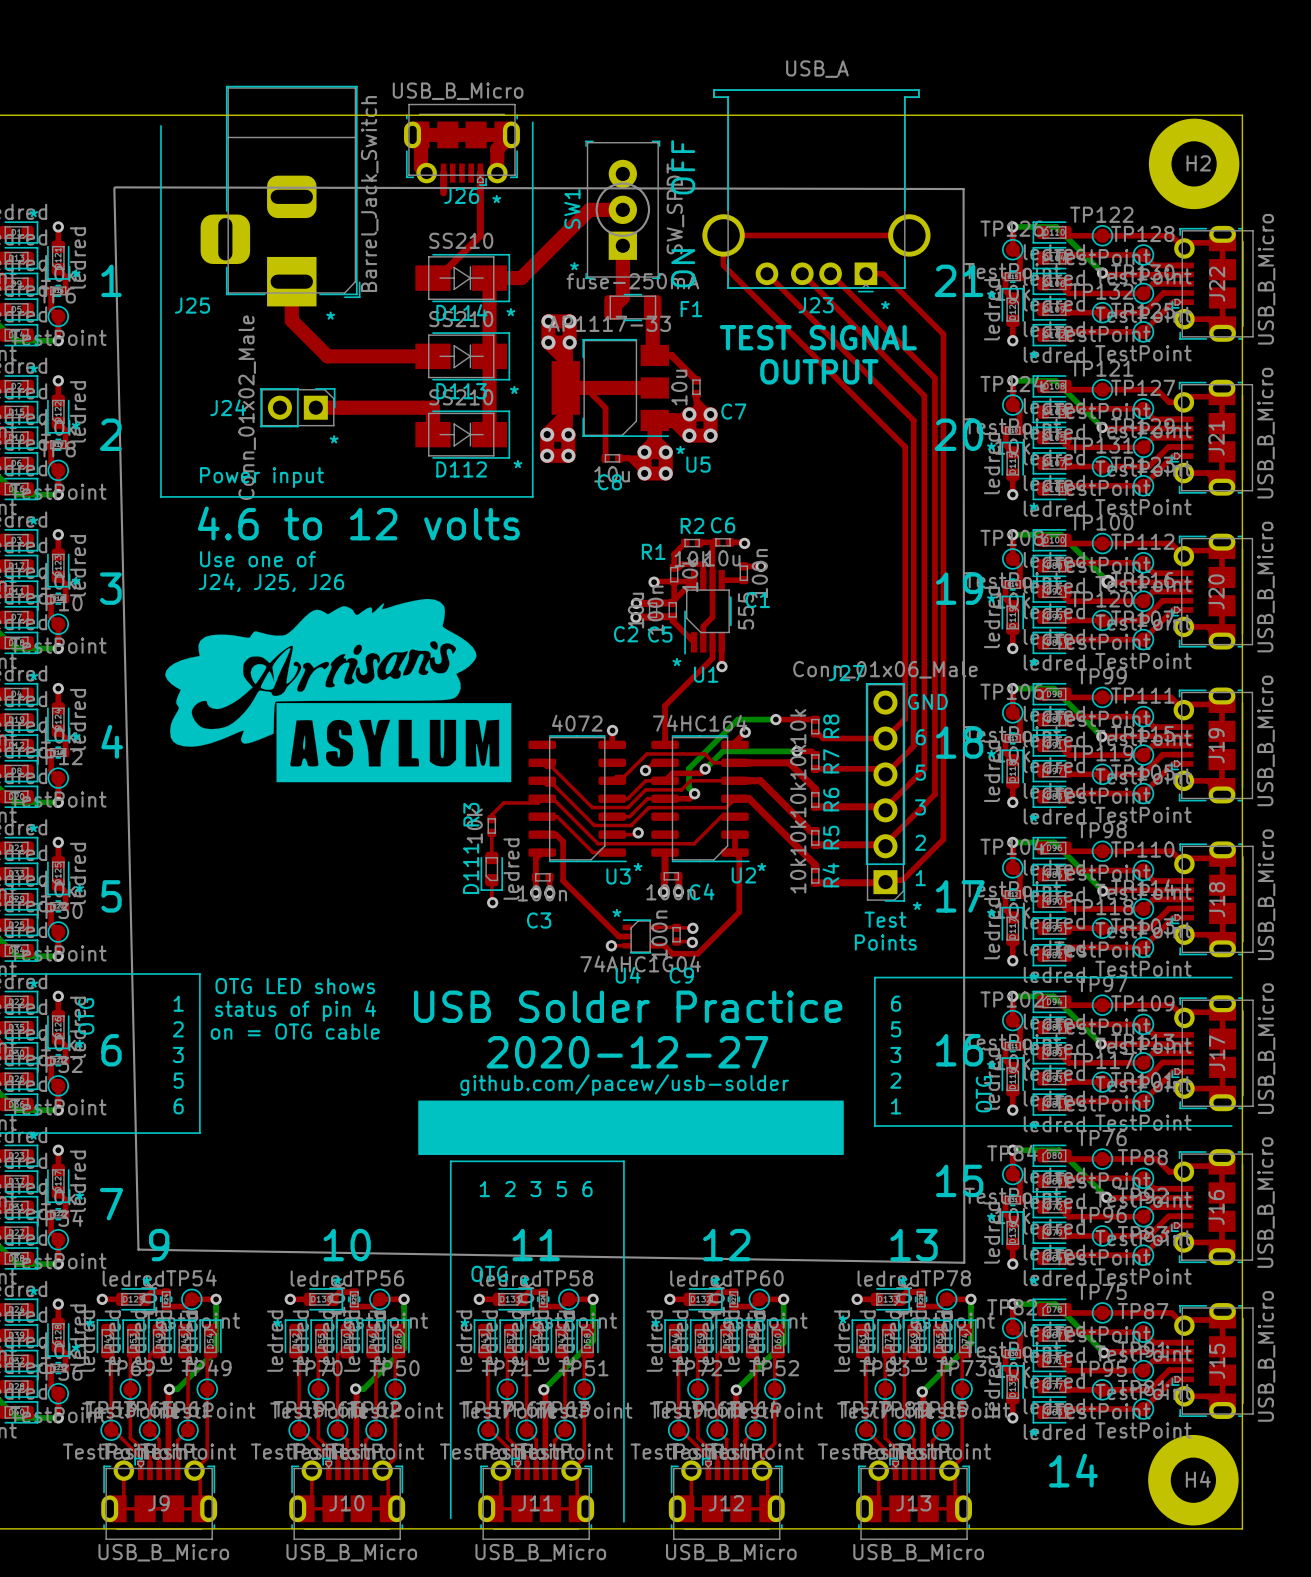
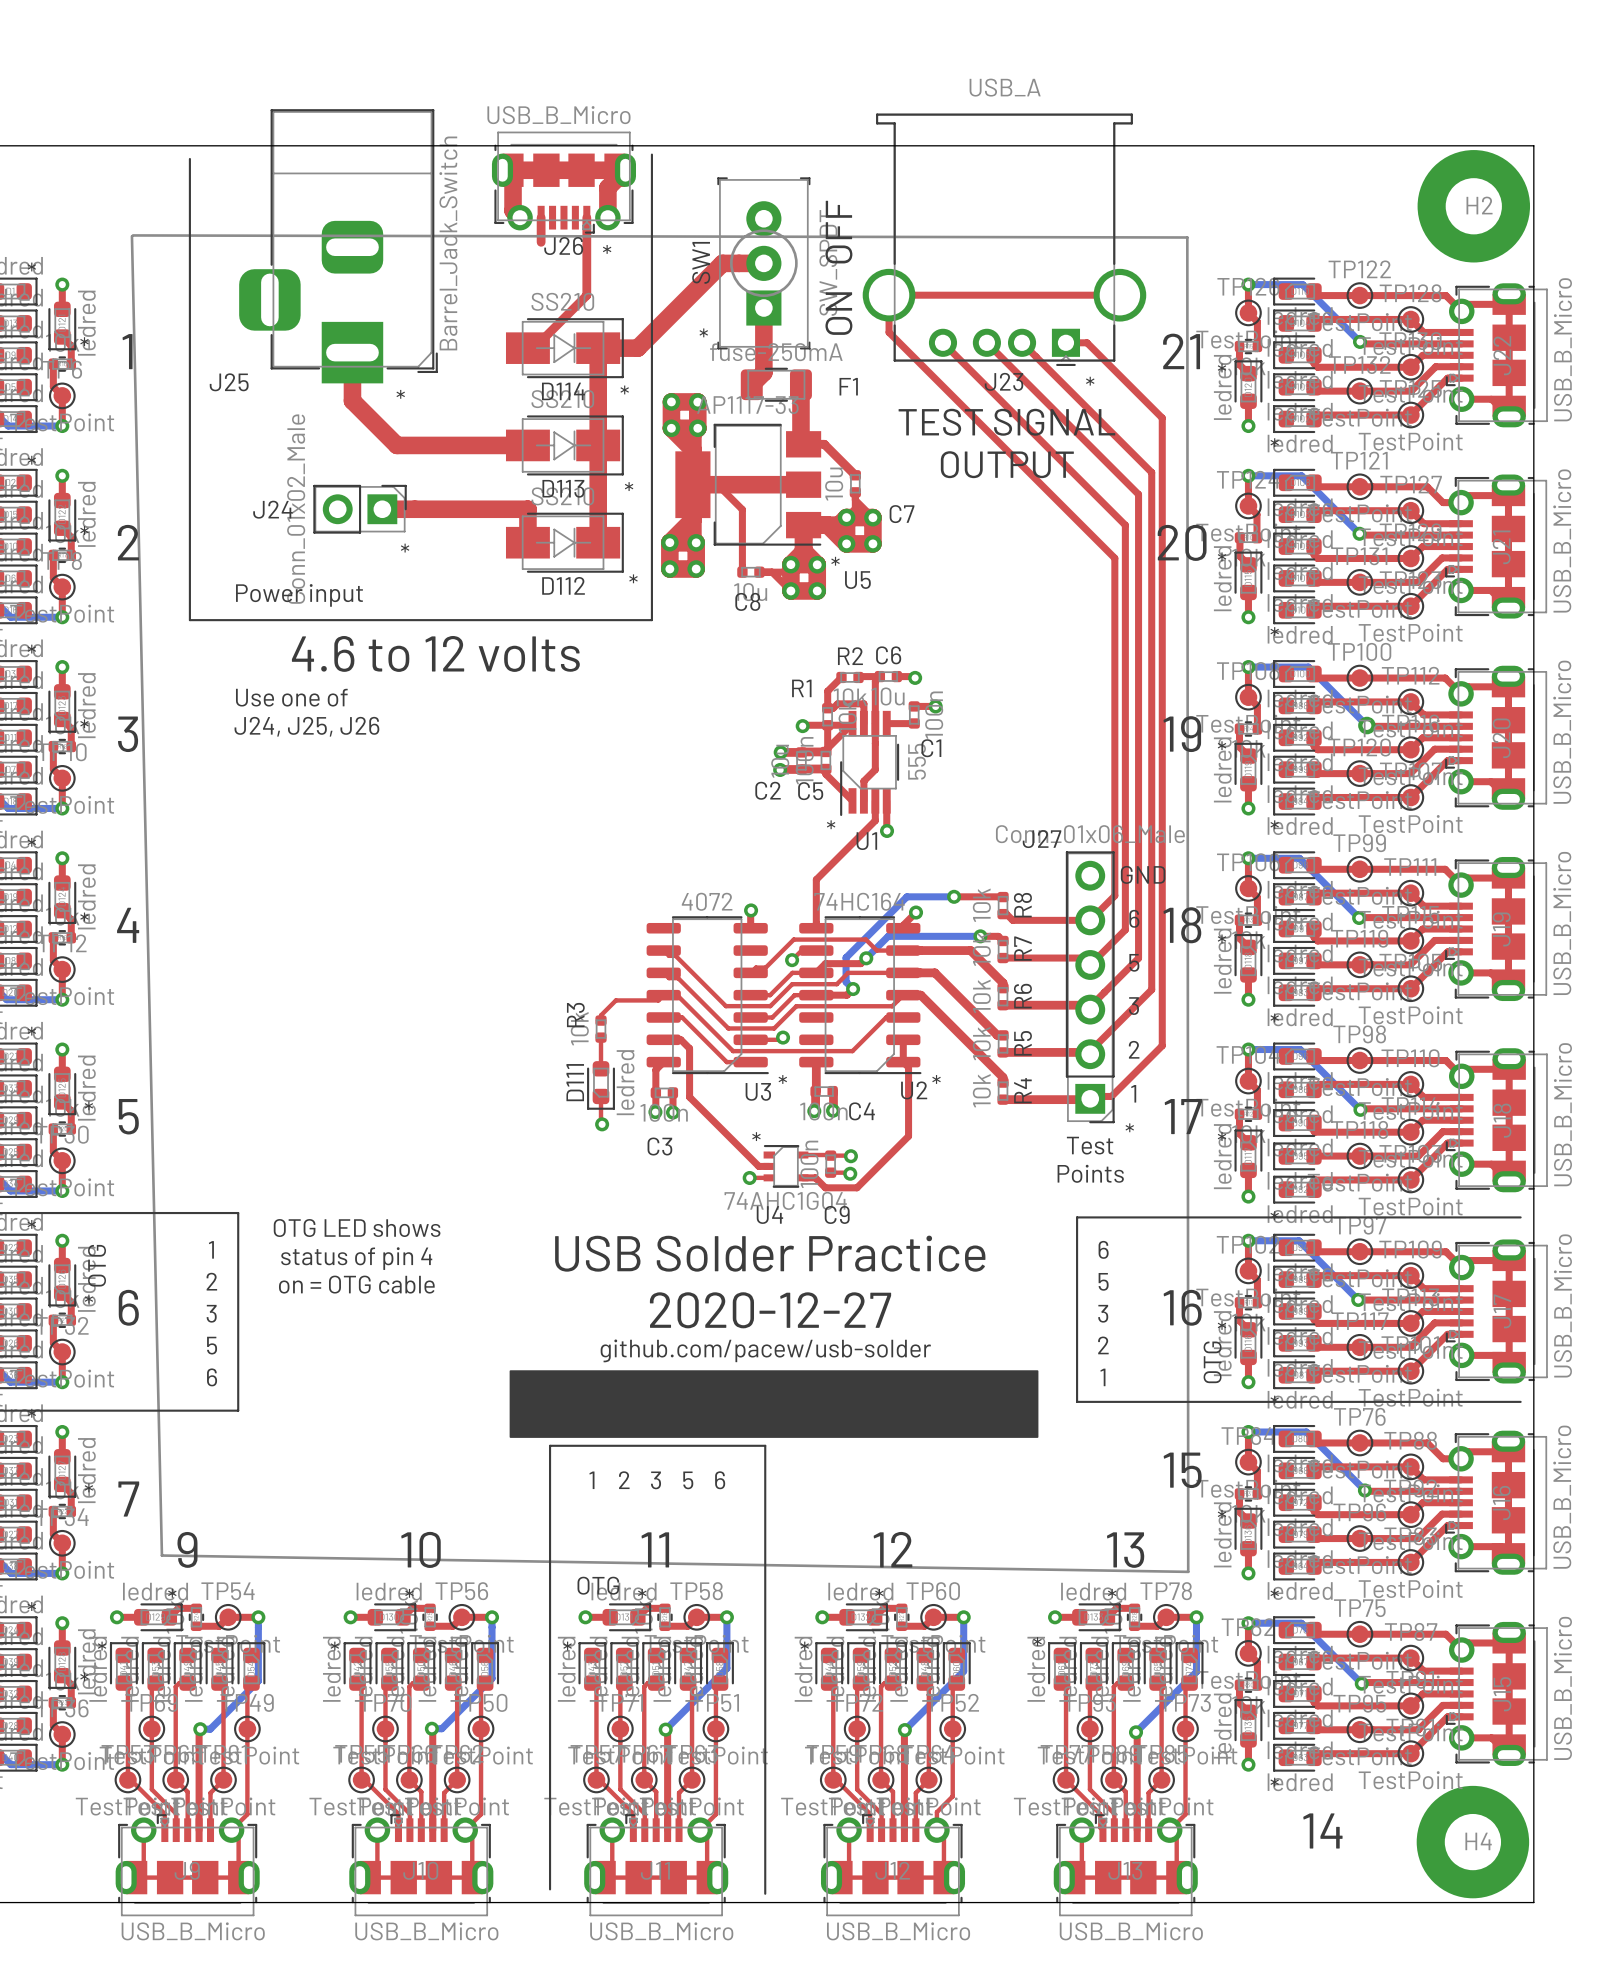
drawing: [165, 598, 512, 783] -> none

